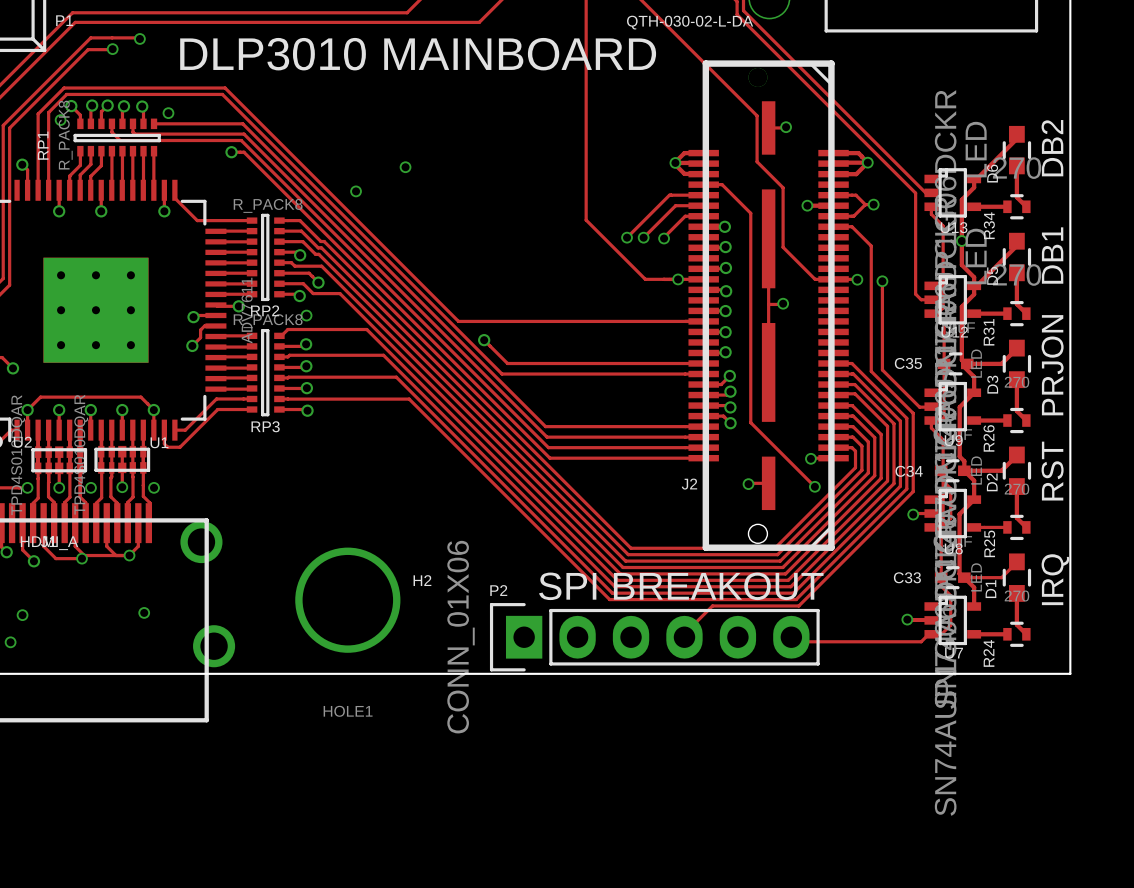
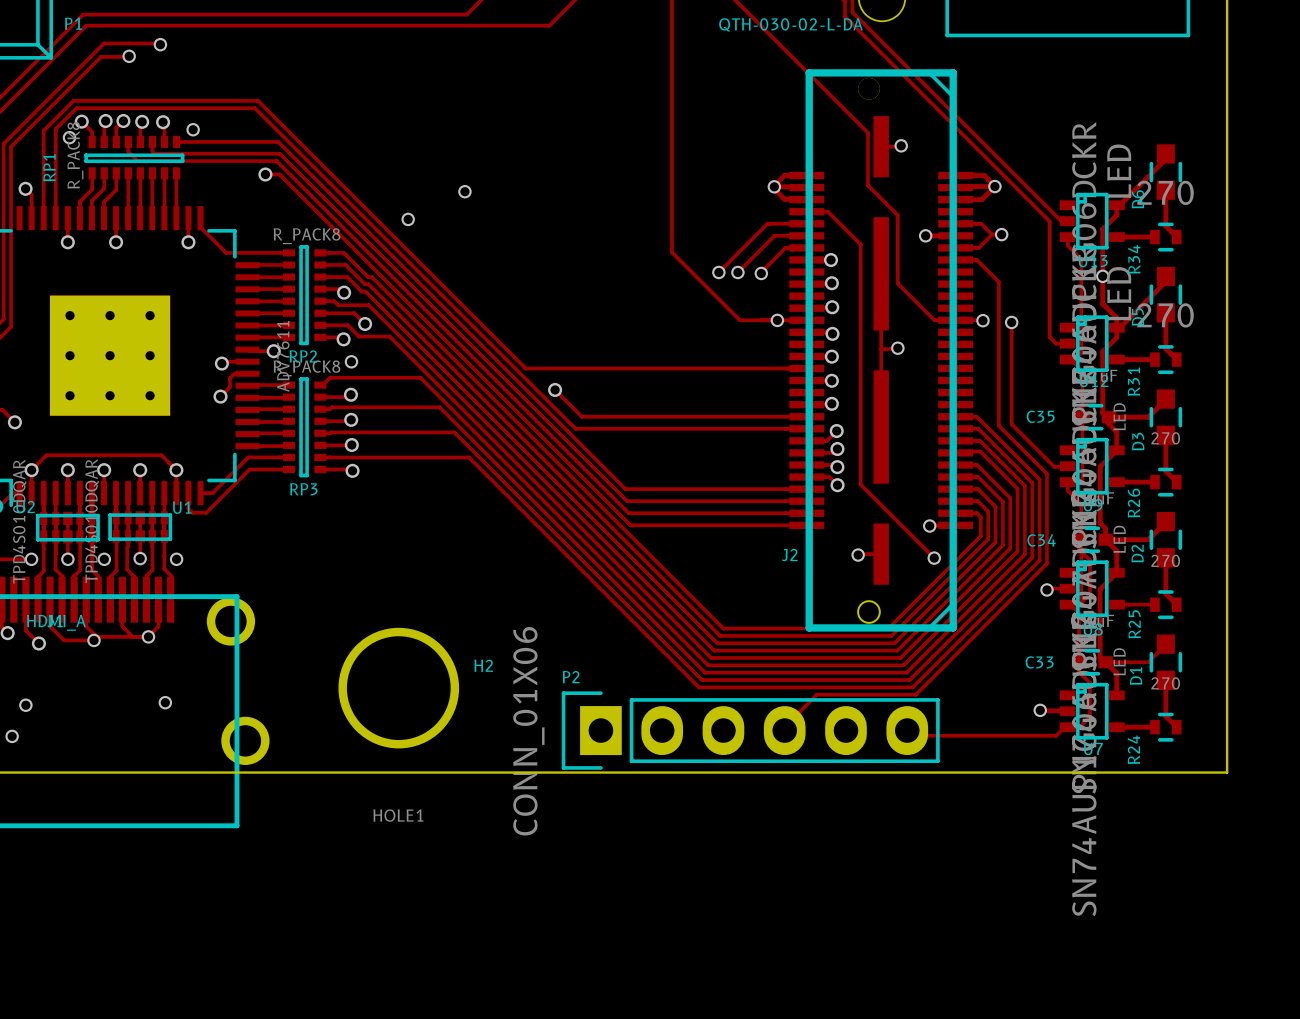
text: DLP3010 MAINBOARD (418, 54) -> none
text: DB2 (1052, 148) -> none
text: DB1 (1052, 255) -> none
text: PRJON (1052, 365) -> none
text: RST (1052, 471) -> none
text: IRQ (1055, 579) -> none
text: SPI BREAKOUT (681, 586) -> none

